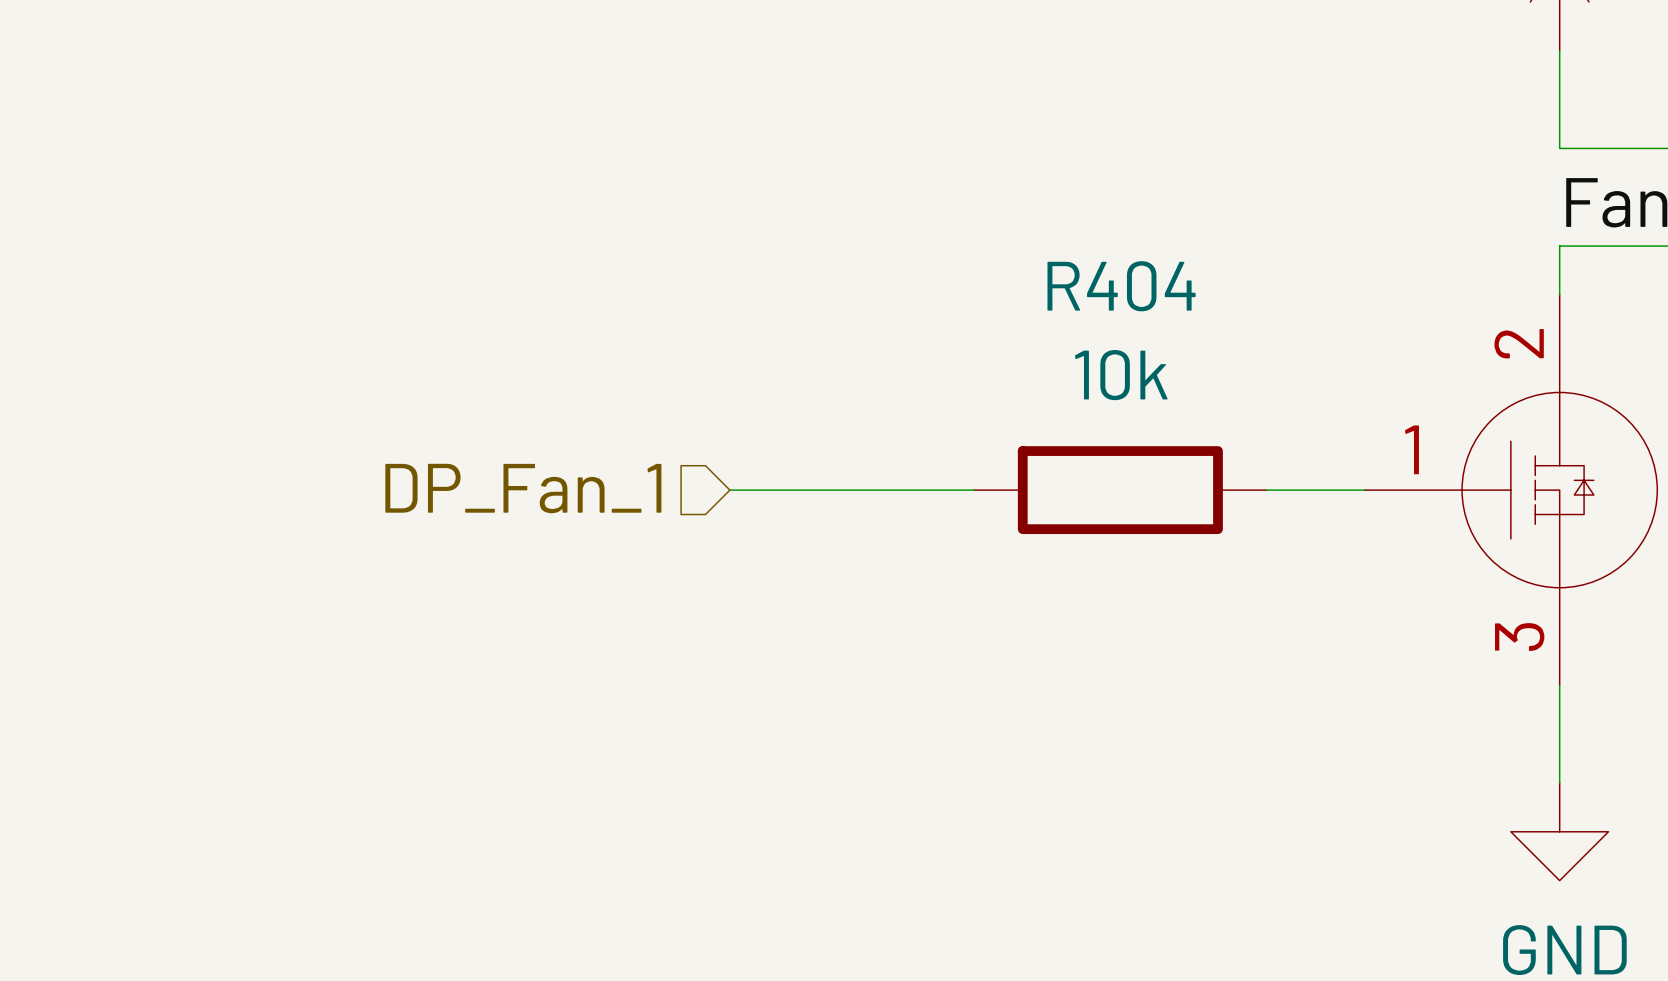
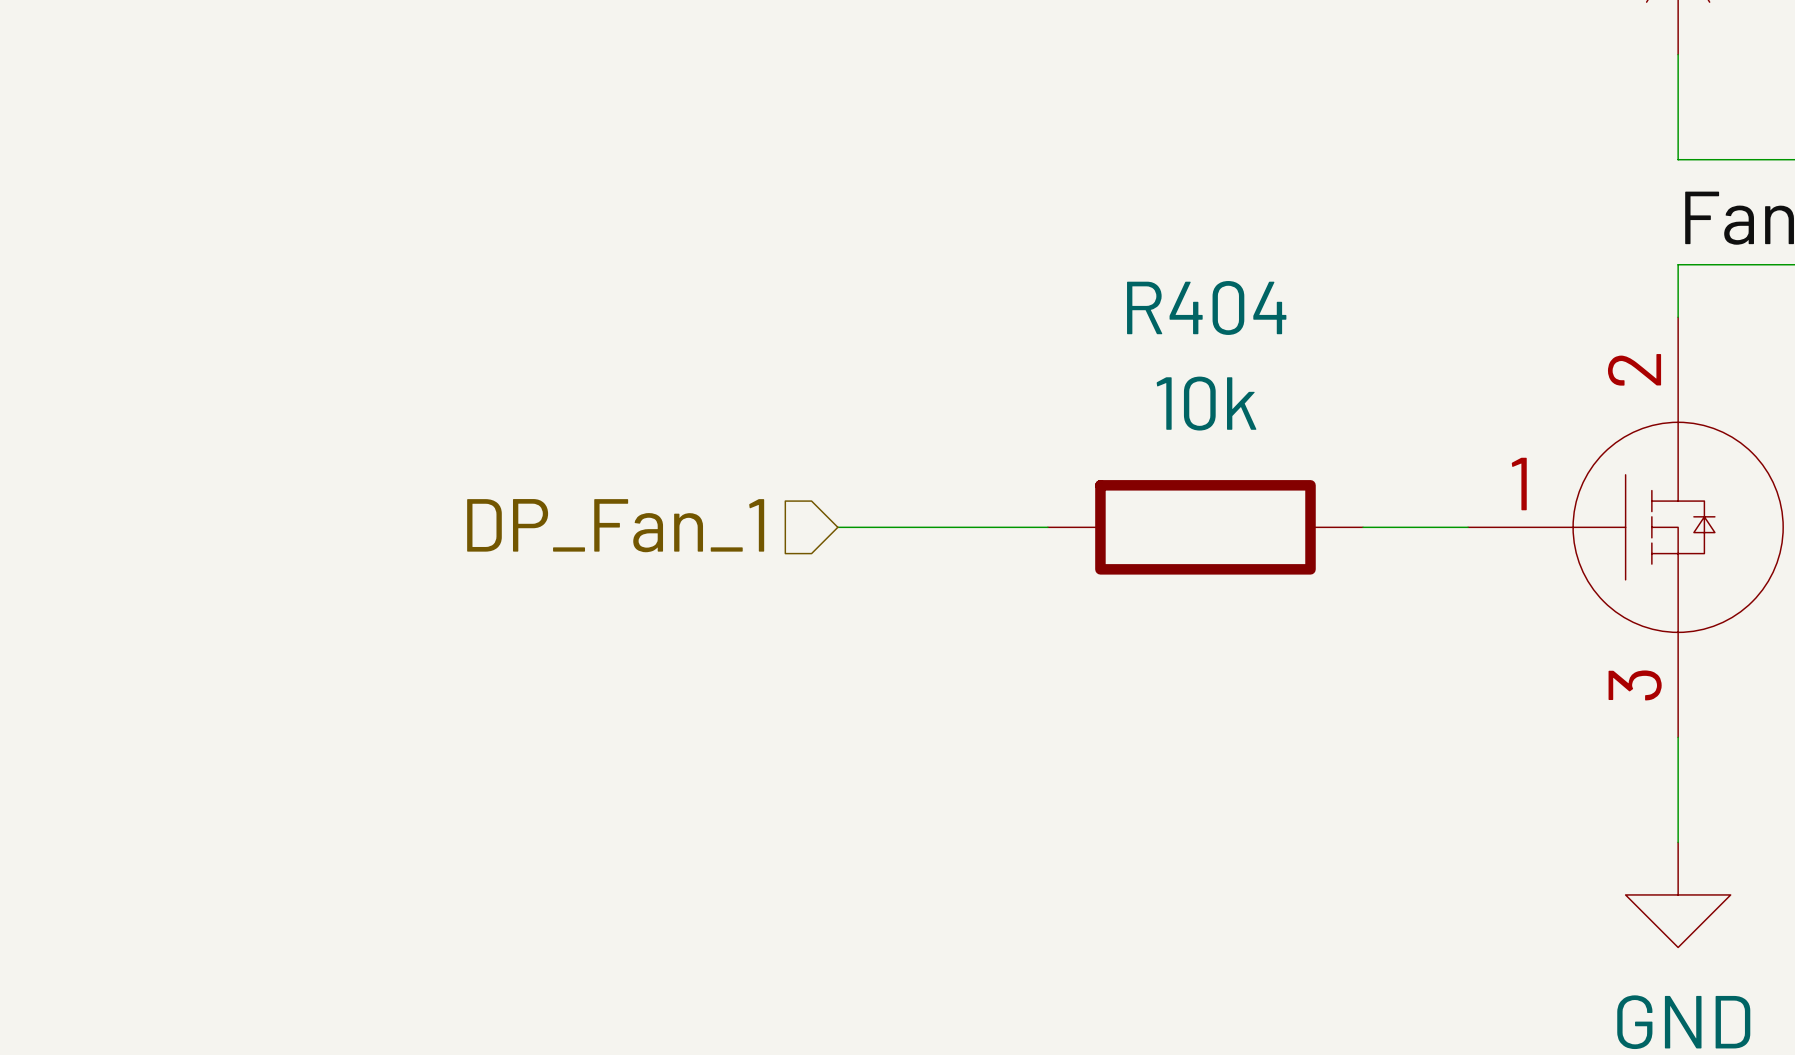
hierarchical label position: DP_Fan_1 (523, 488) -> DP_Fan_1 (615, 525)
wire: (729, 490) (778, 490) -> none

